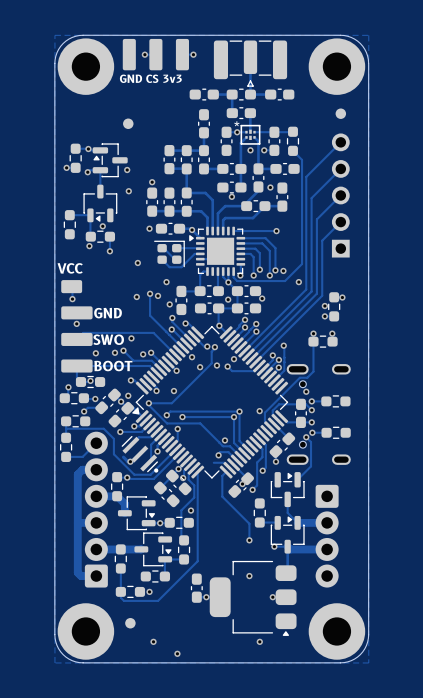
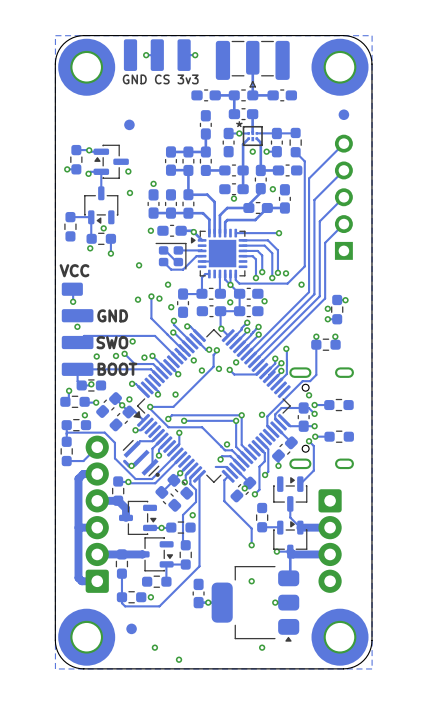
track: (240, 264) (240, 275) -> none
via: (240, 275) -> none
track: (101, 407) (87, 407) (84, 411) -> none
track: (149, 423) (141, 431) (120, 431) -> none
via: (120, 431) -> none

